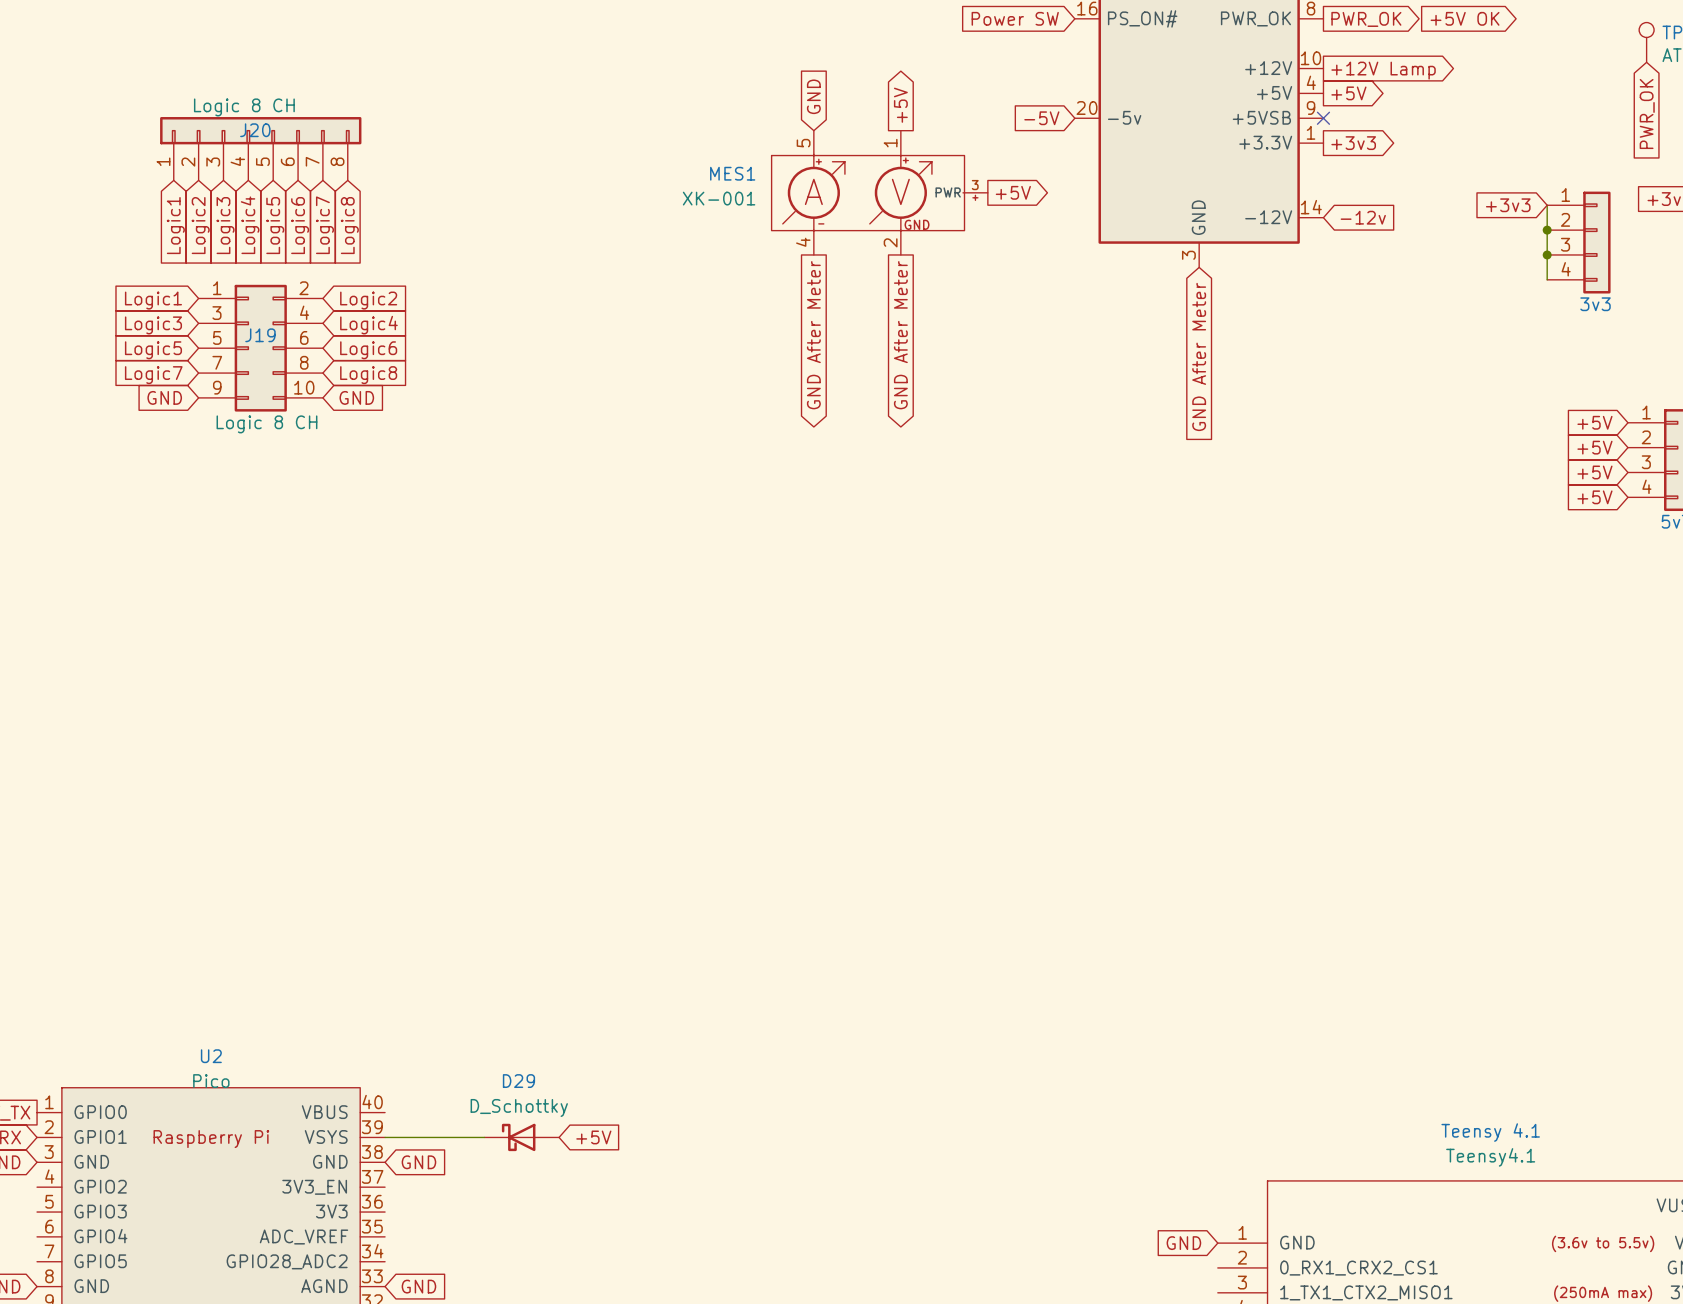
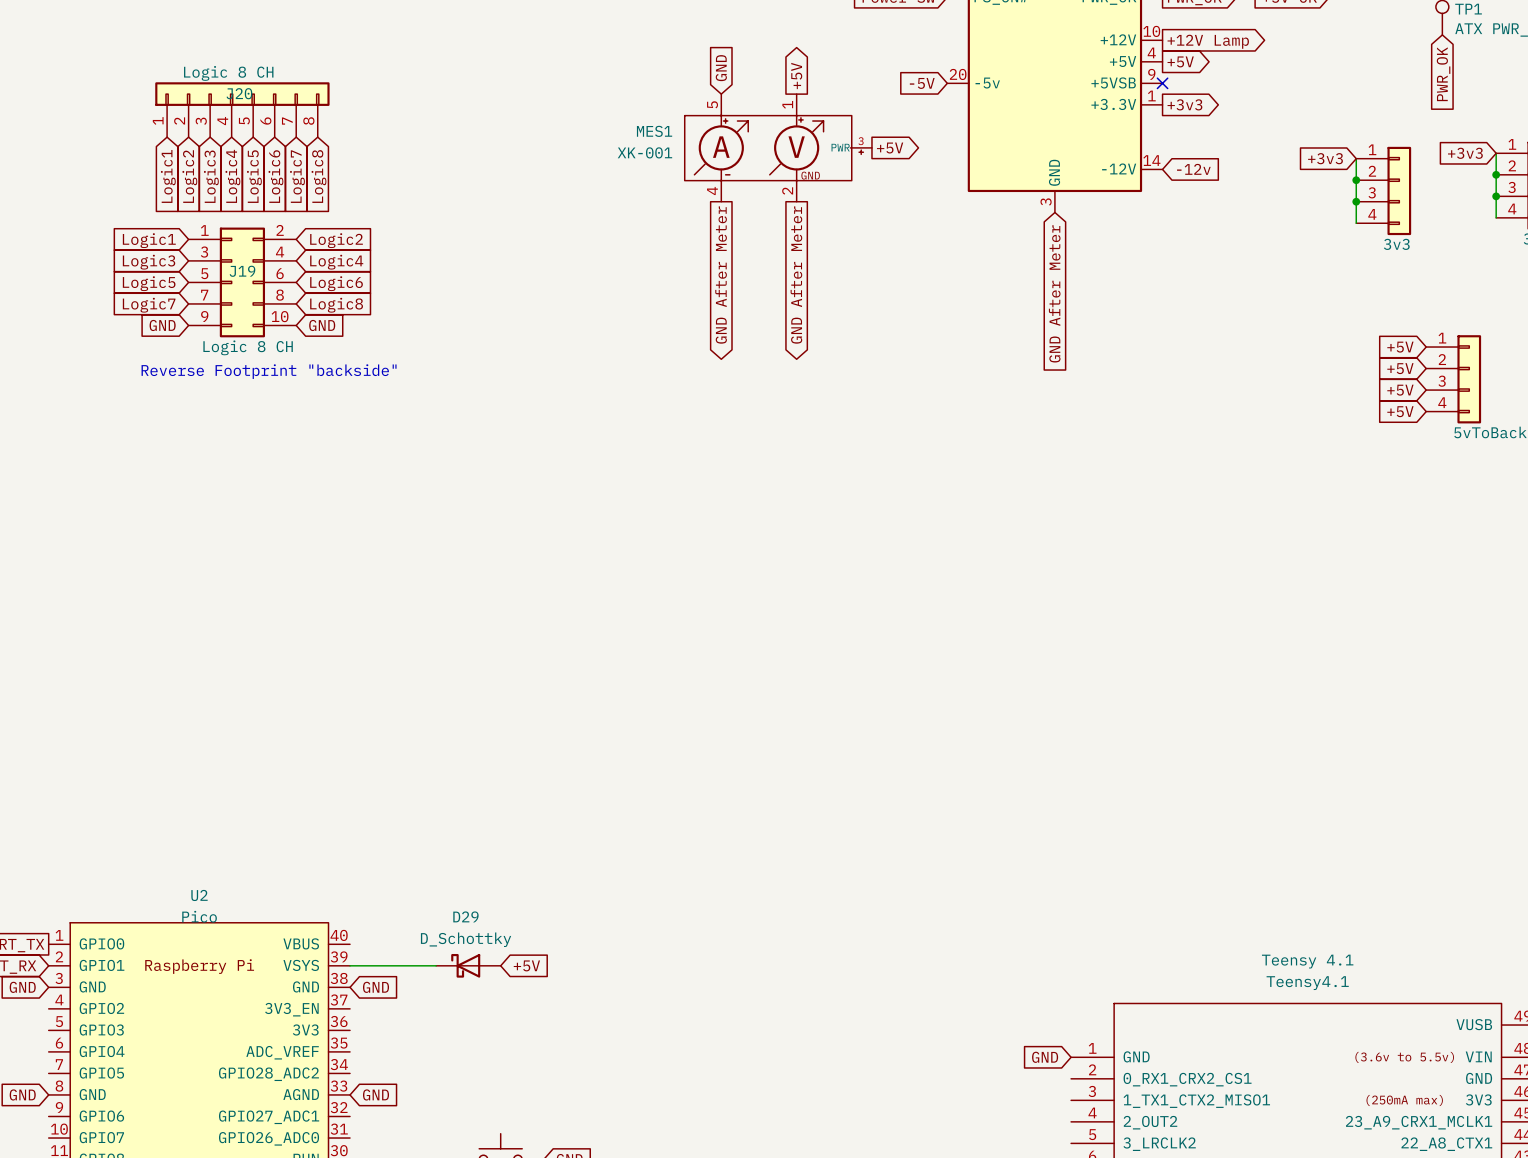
text: none -> Reverse Footprint "backside" (269, 371)

